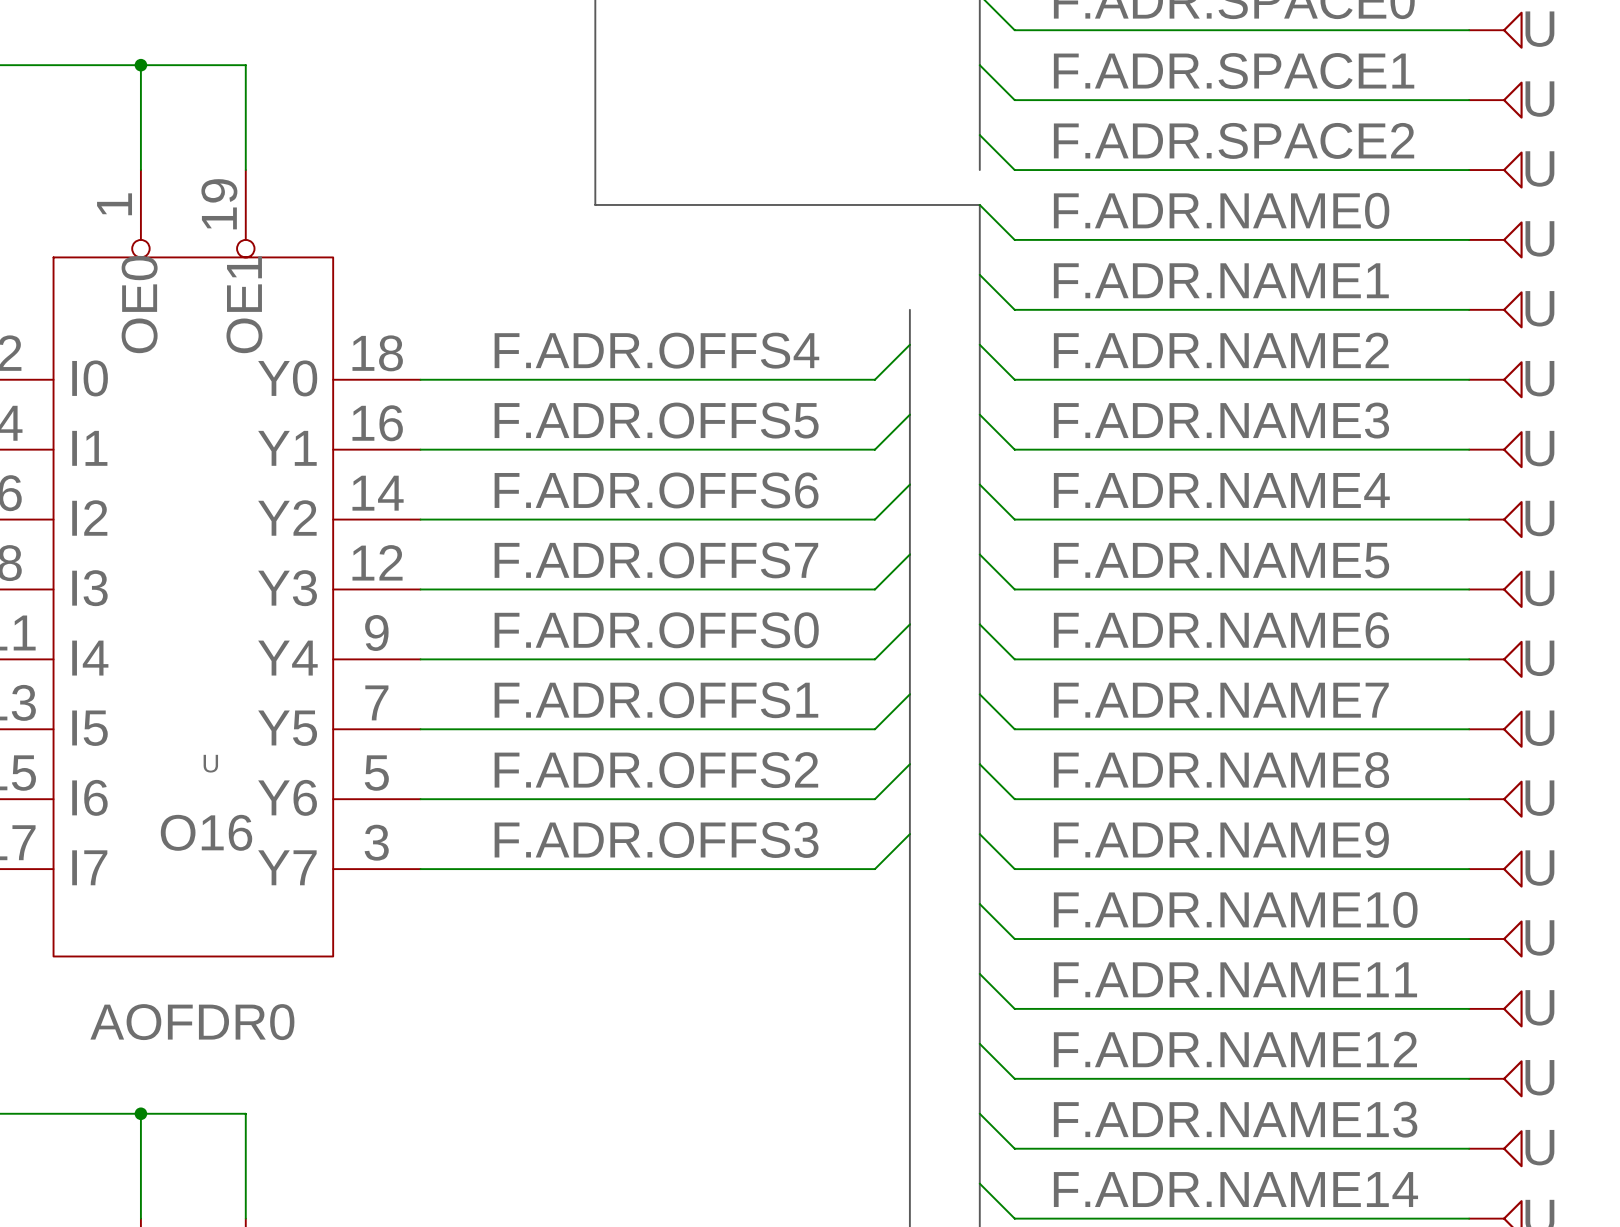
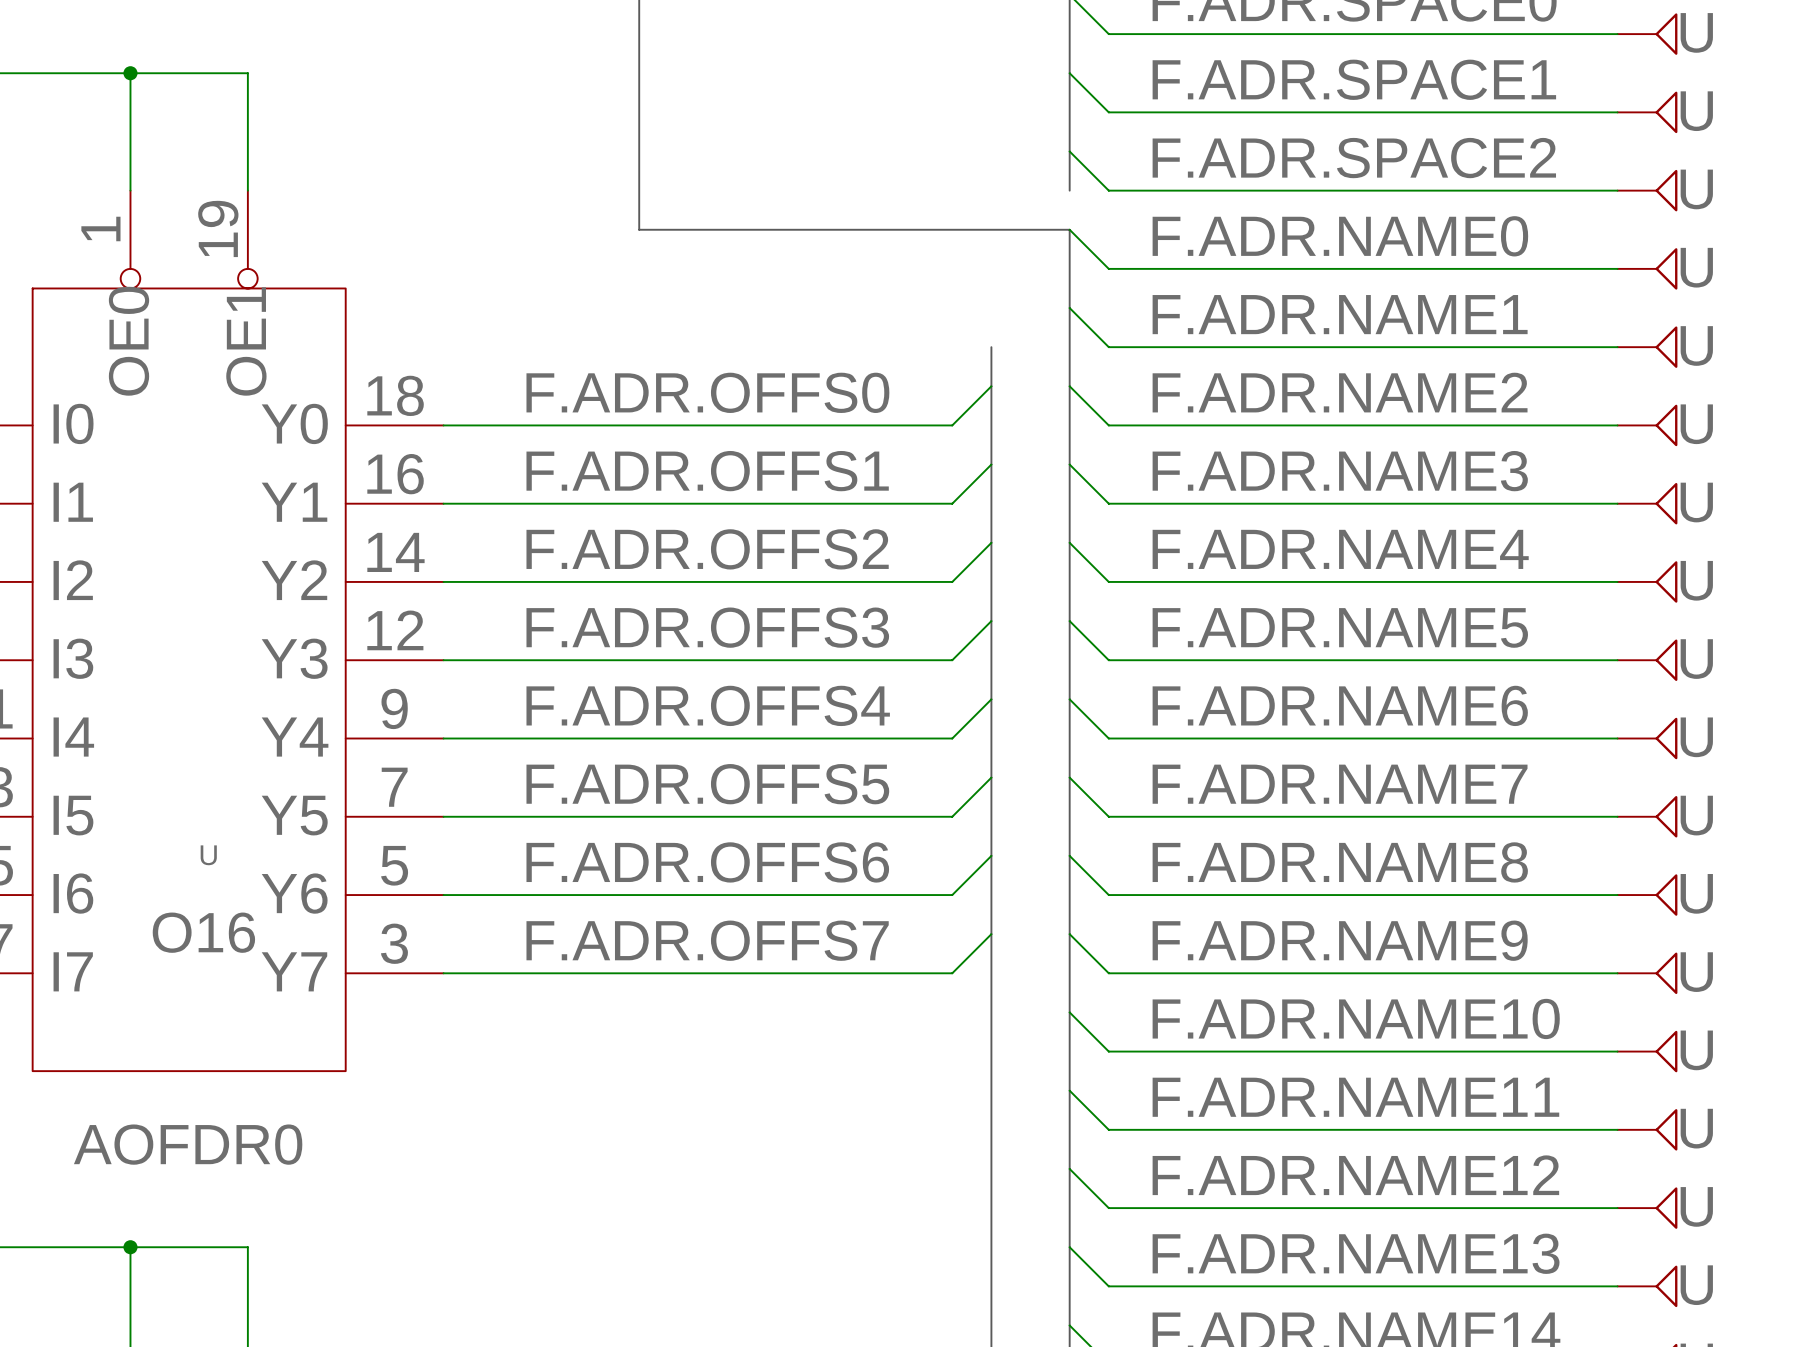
label: F.ADR.OFFS4 (656, 350) -> F.ADR.OFFS0 (707, 392)
label: F.ADR.OFFS5 (656, 420) -> F.ADR.OFFS1 (707, 471)
label: F.ADR.OFFS6 (656, 490) -> F.ADR.OFFS2 (707, 549)
label: F.ADR.OFFS7 (656, 560) -> F.ADR.OFFS3 (707, 627)
label: F.ADR.OFFS0 (656, 630) -> F.ADR.OFFS4 (708, 705)
label: F.ADR.OFFS1 (656, 700) -> F.ADR.OFFS5 (707, 784)
label: F.ADR.OFFS2 (656, 770) -> F.ADR.OFFS6 (707, 862)
label: F.ADR.OFFS3 (656, 839) -> F.ADR.OFFS7 (707, 940)

